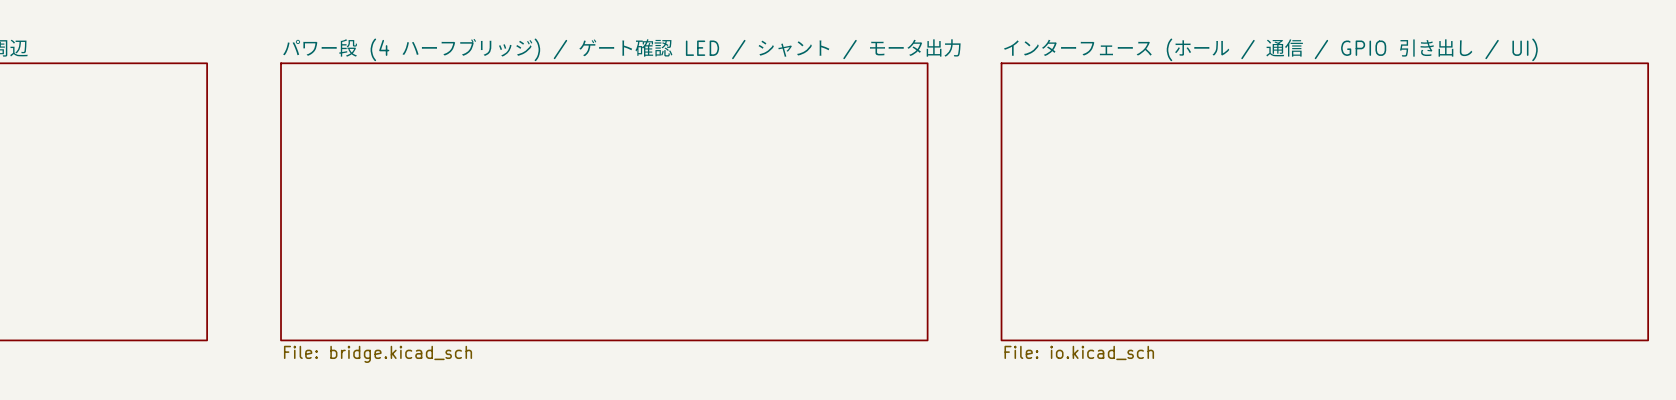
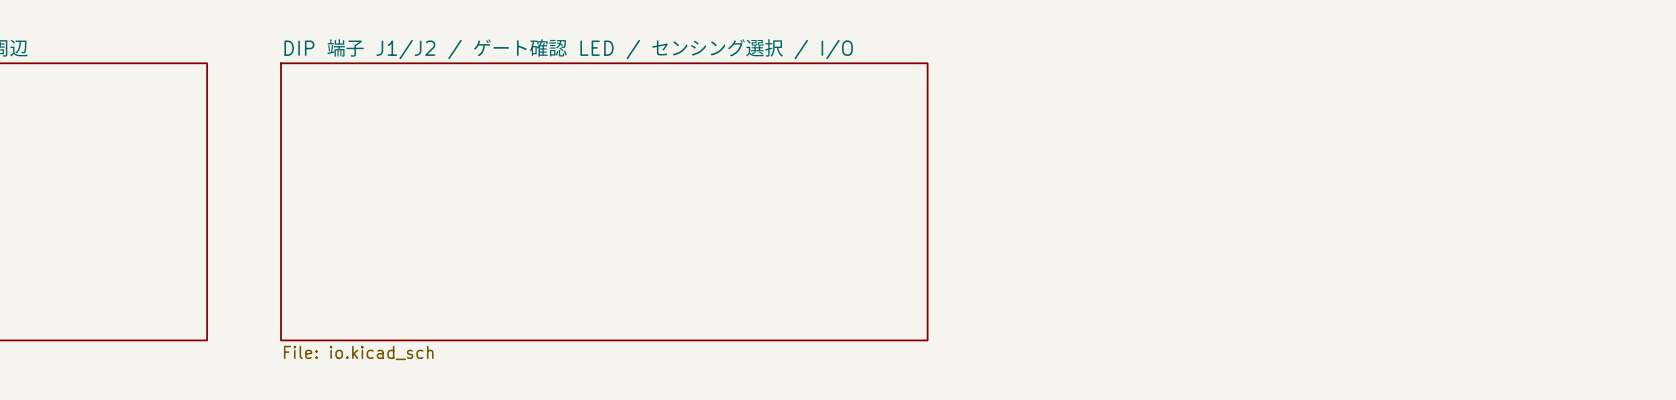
sheet パワー段 (4 ハーフブリッジ) / ゲート確認 LED / シャント / モータ出力 name: パワー段 (4 ハーフブリッジ) / ゲート確認 LED / シャント / モータ出力 (621, 49) -> DIP 端子 J1/J2 / ゲート確認 LED / センシング選択 / I/O (568, 48)
sheet インターフェース (ホール / 通信 / GPIO 引き出し / UI): File: io.kicad_sch (1324, 201) -> none
sheet パワー段 (4 ハーフブリッジ) / ゲート確認 LED / シャント / モータ出力 value: File: bridge.kicad_sch (378, 354) -> File: io.kicad_sch (358, 352)

